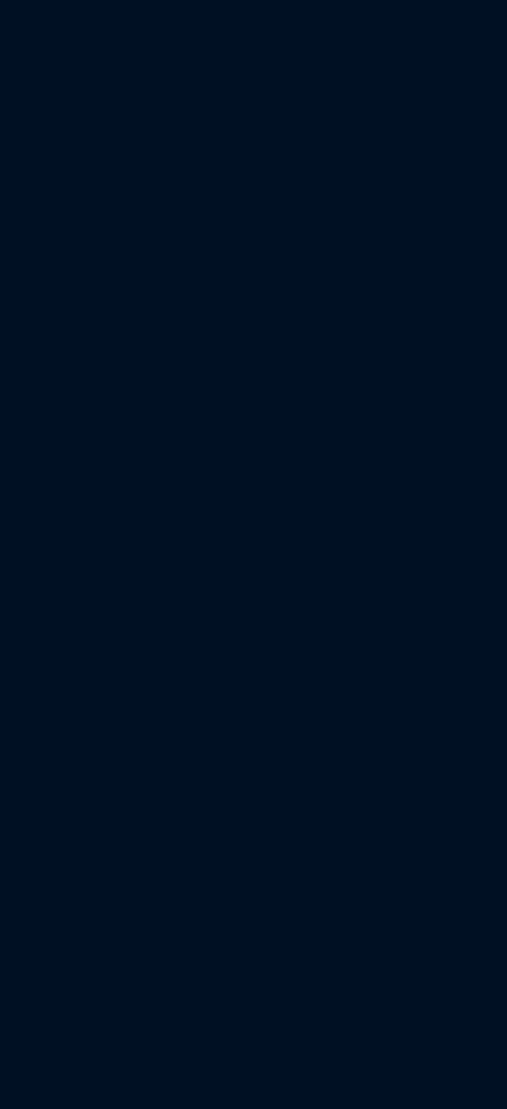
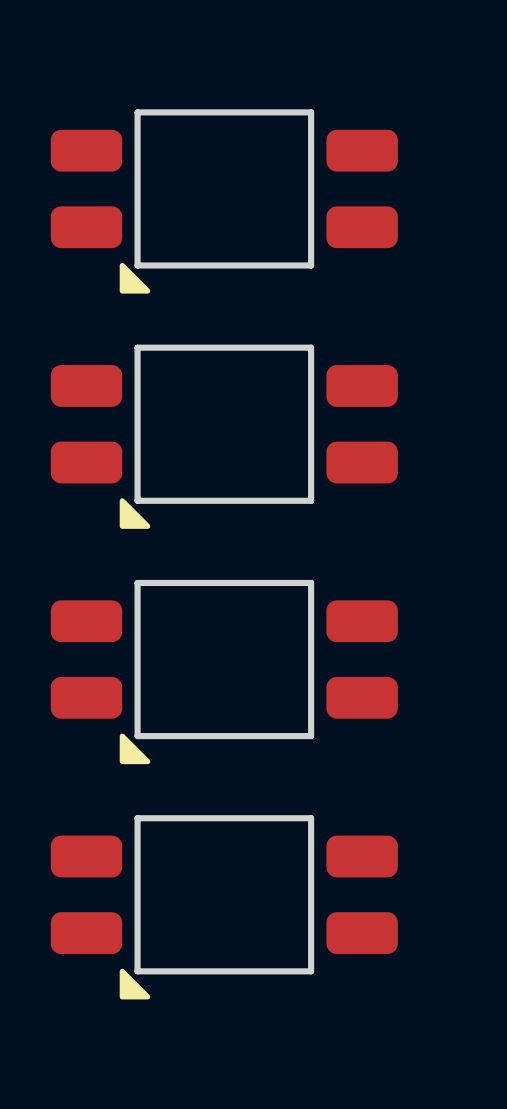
part: none -> (224, 201)
part: none -> (224, 436)
part: none -> (224, 672)
part: none -> (224, 907)

